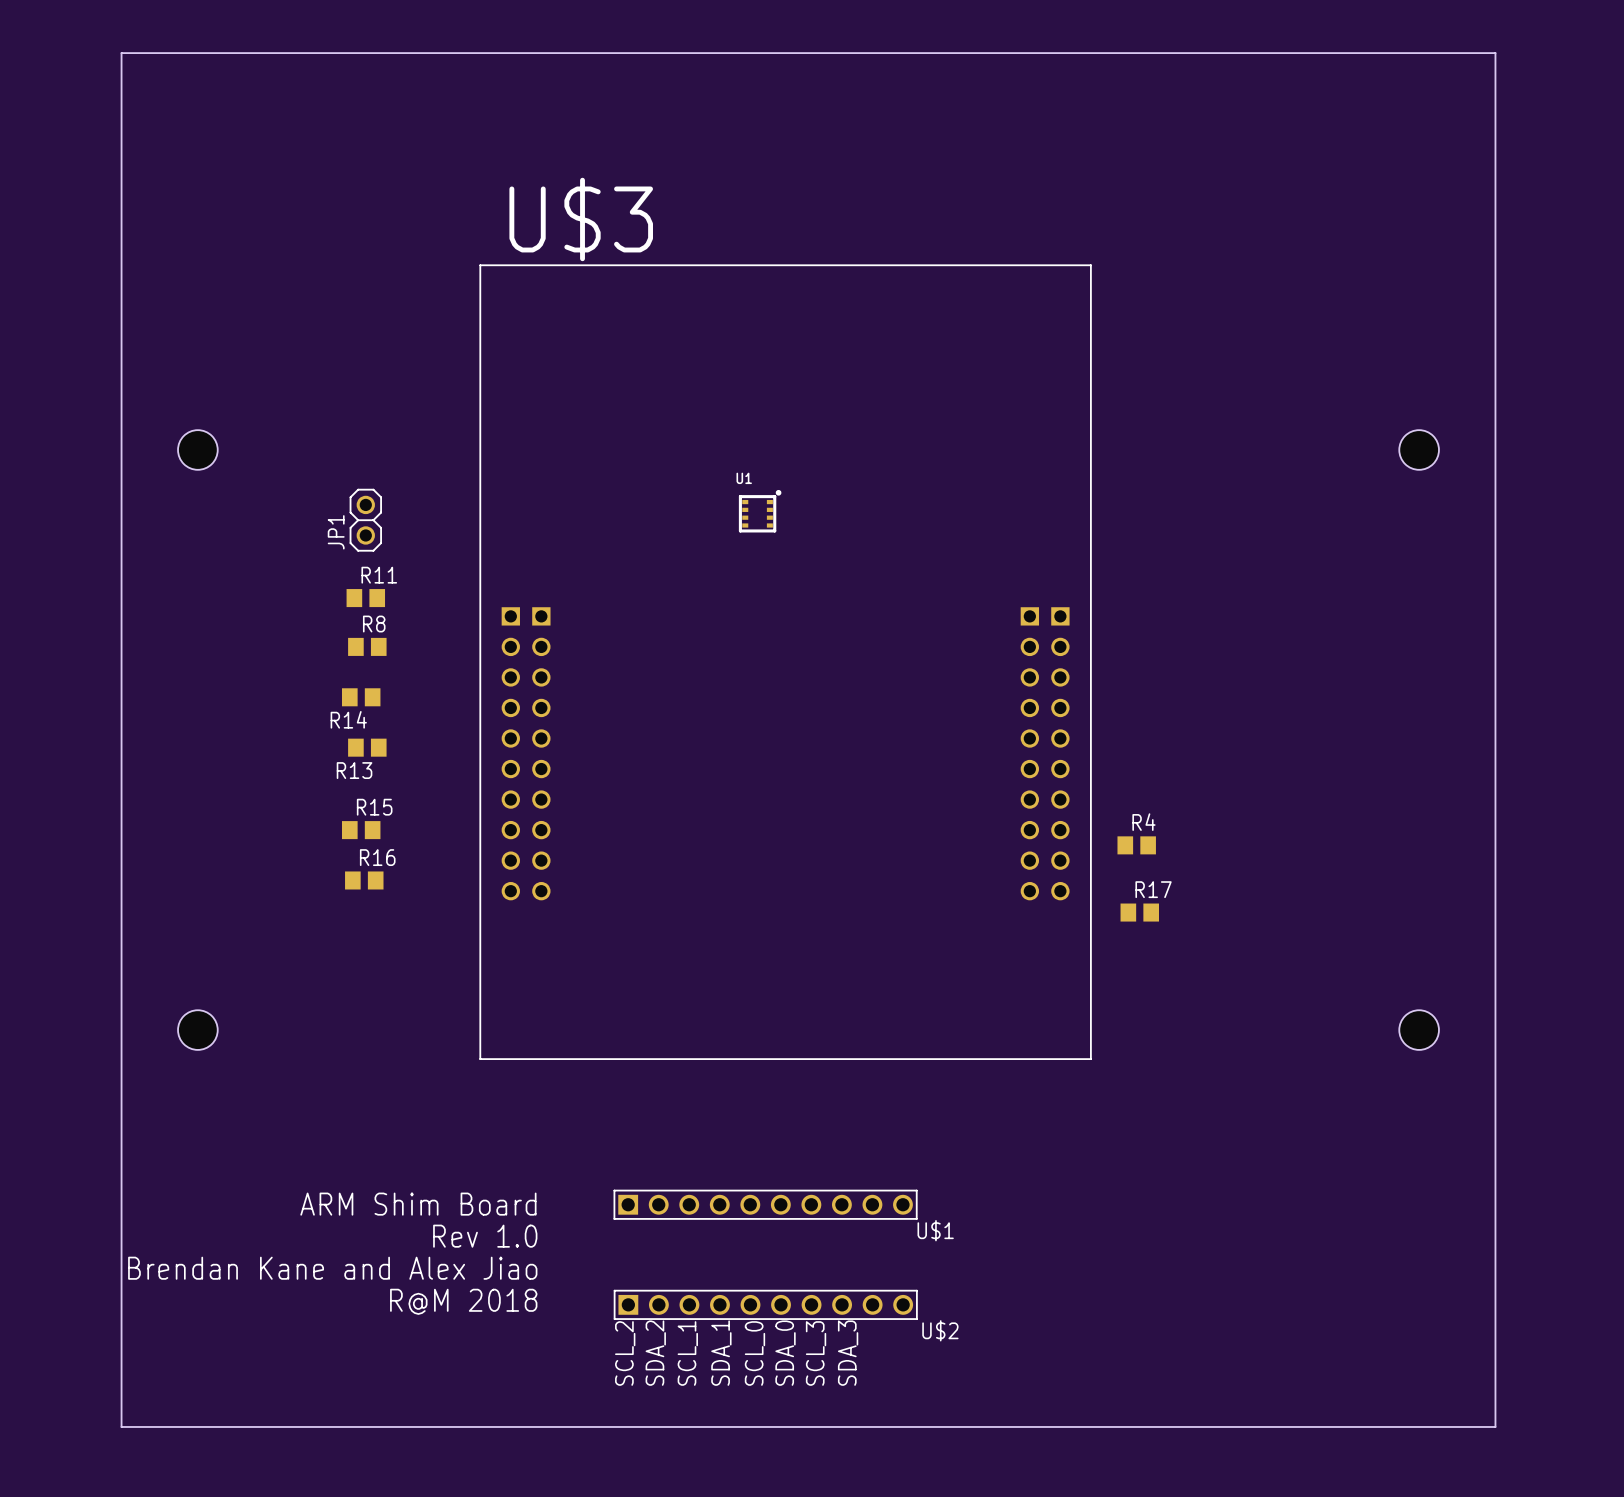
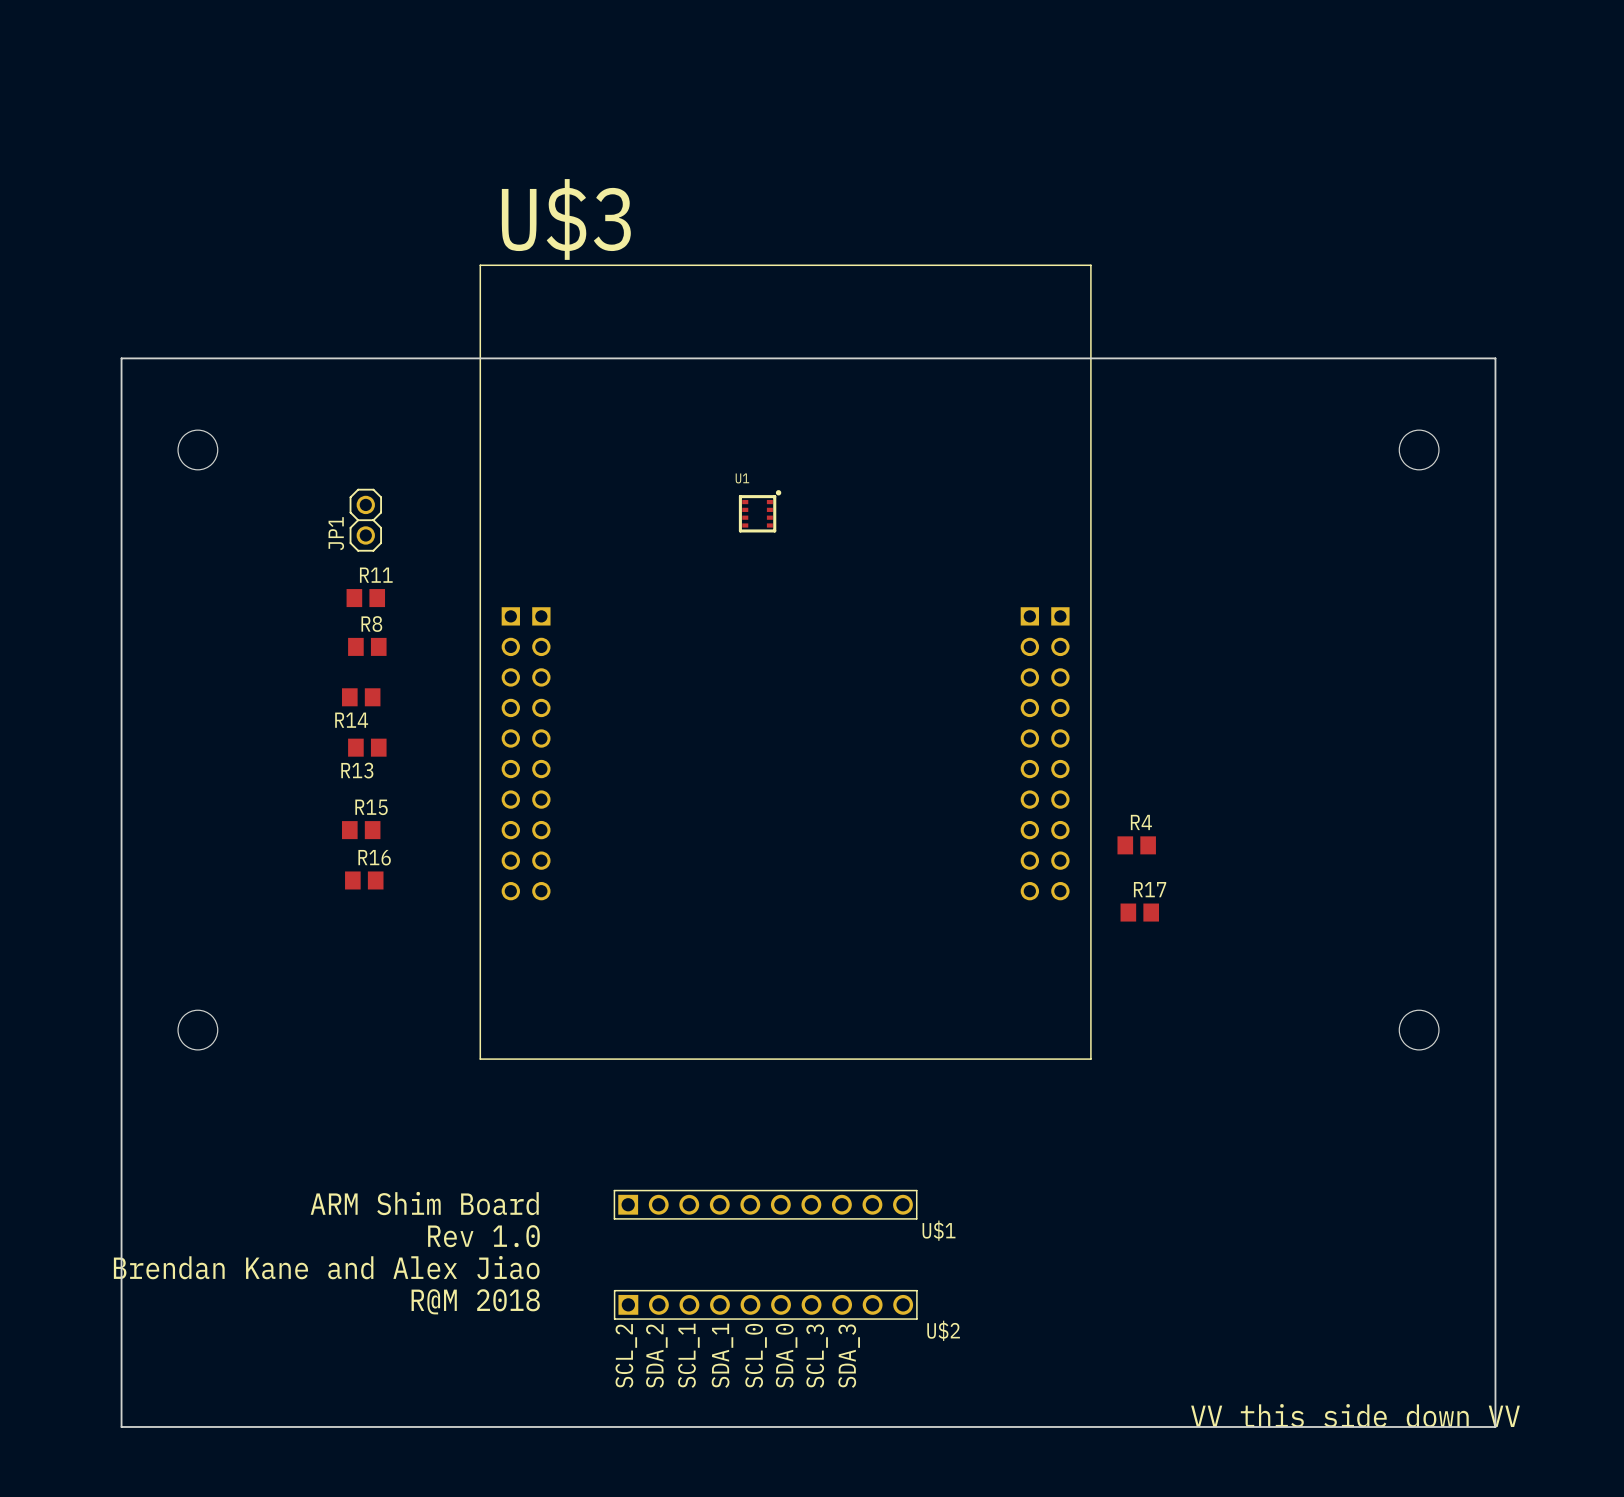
board edge: (121, 358) (121, 53) (1495, 53) (1495, 358) -> (121, 358) (1495, 358)
text: none -> VV this side down VV (1355, 1415)

